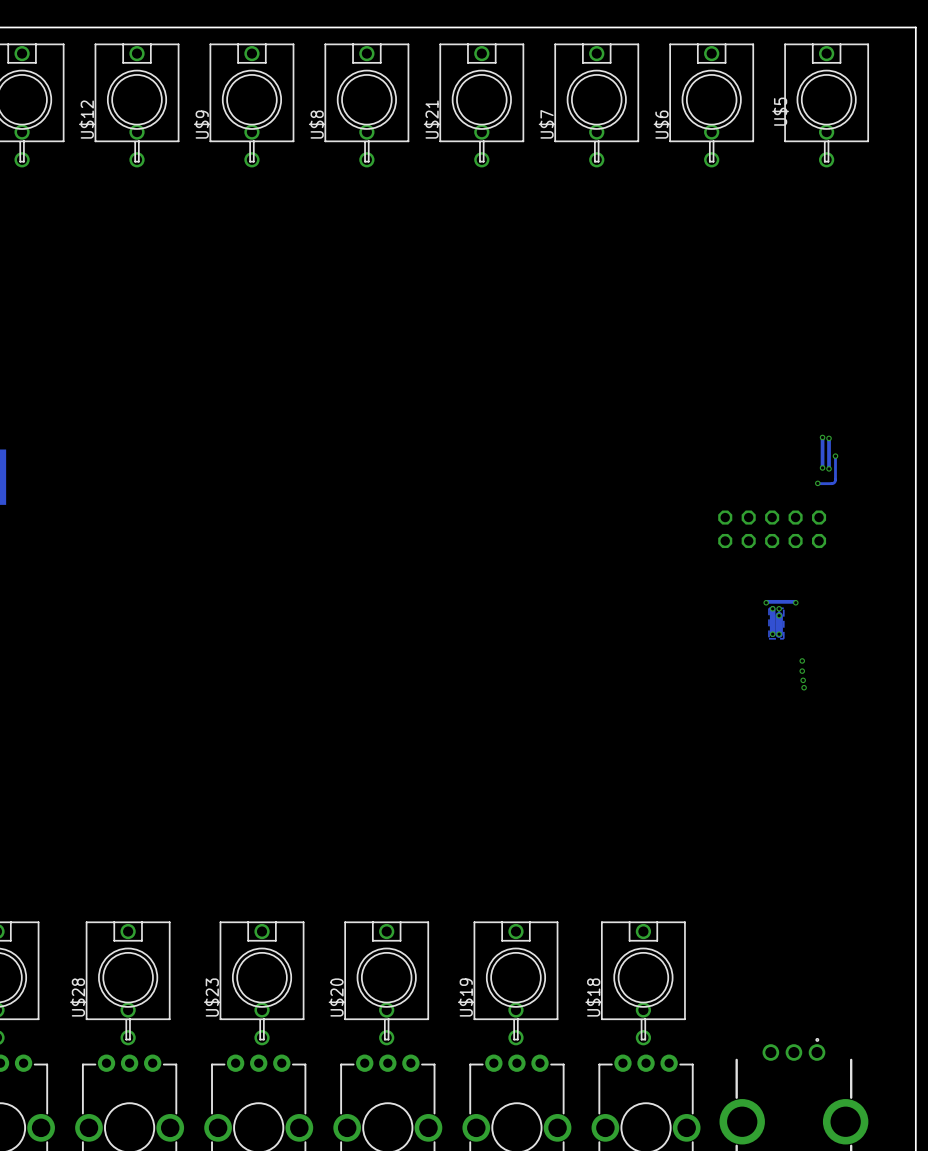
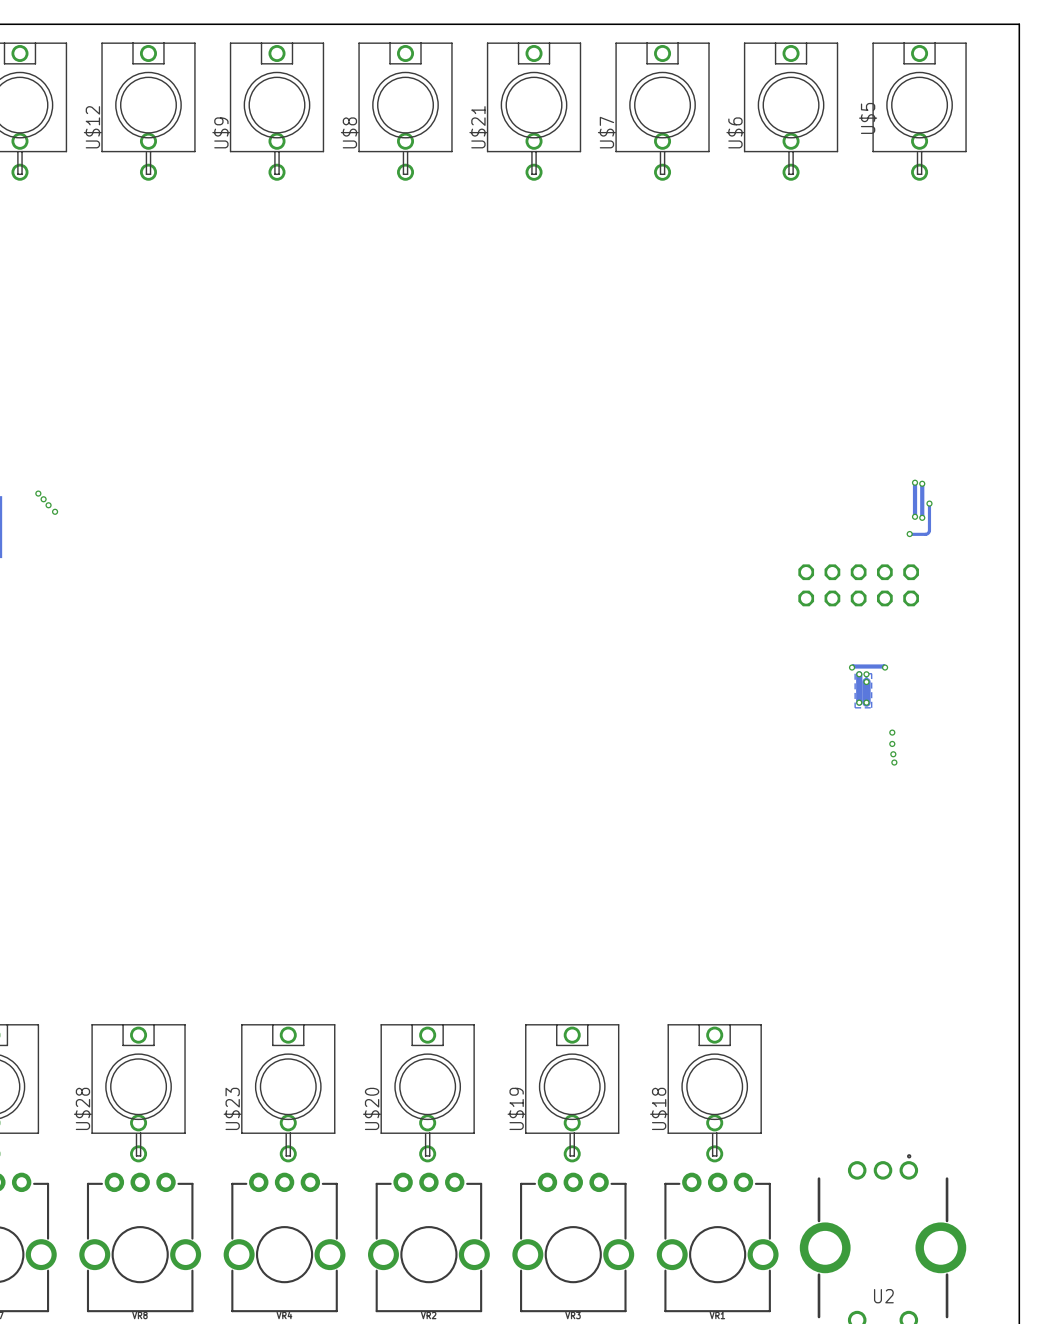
via: none -> (38, 493)
via: none -> (43, 499)
via: none -> (48, 505)
via: none -> (55, 511)

